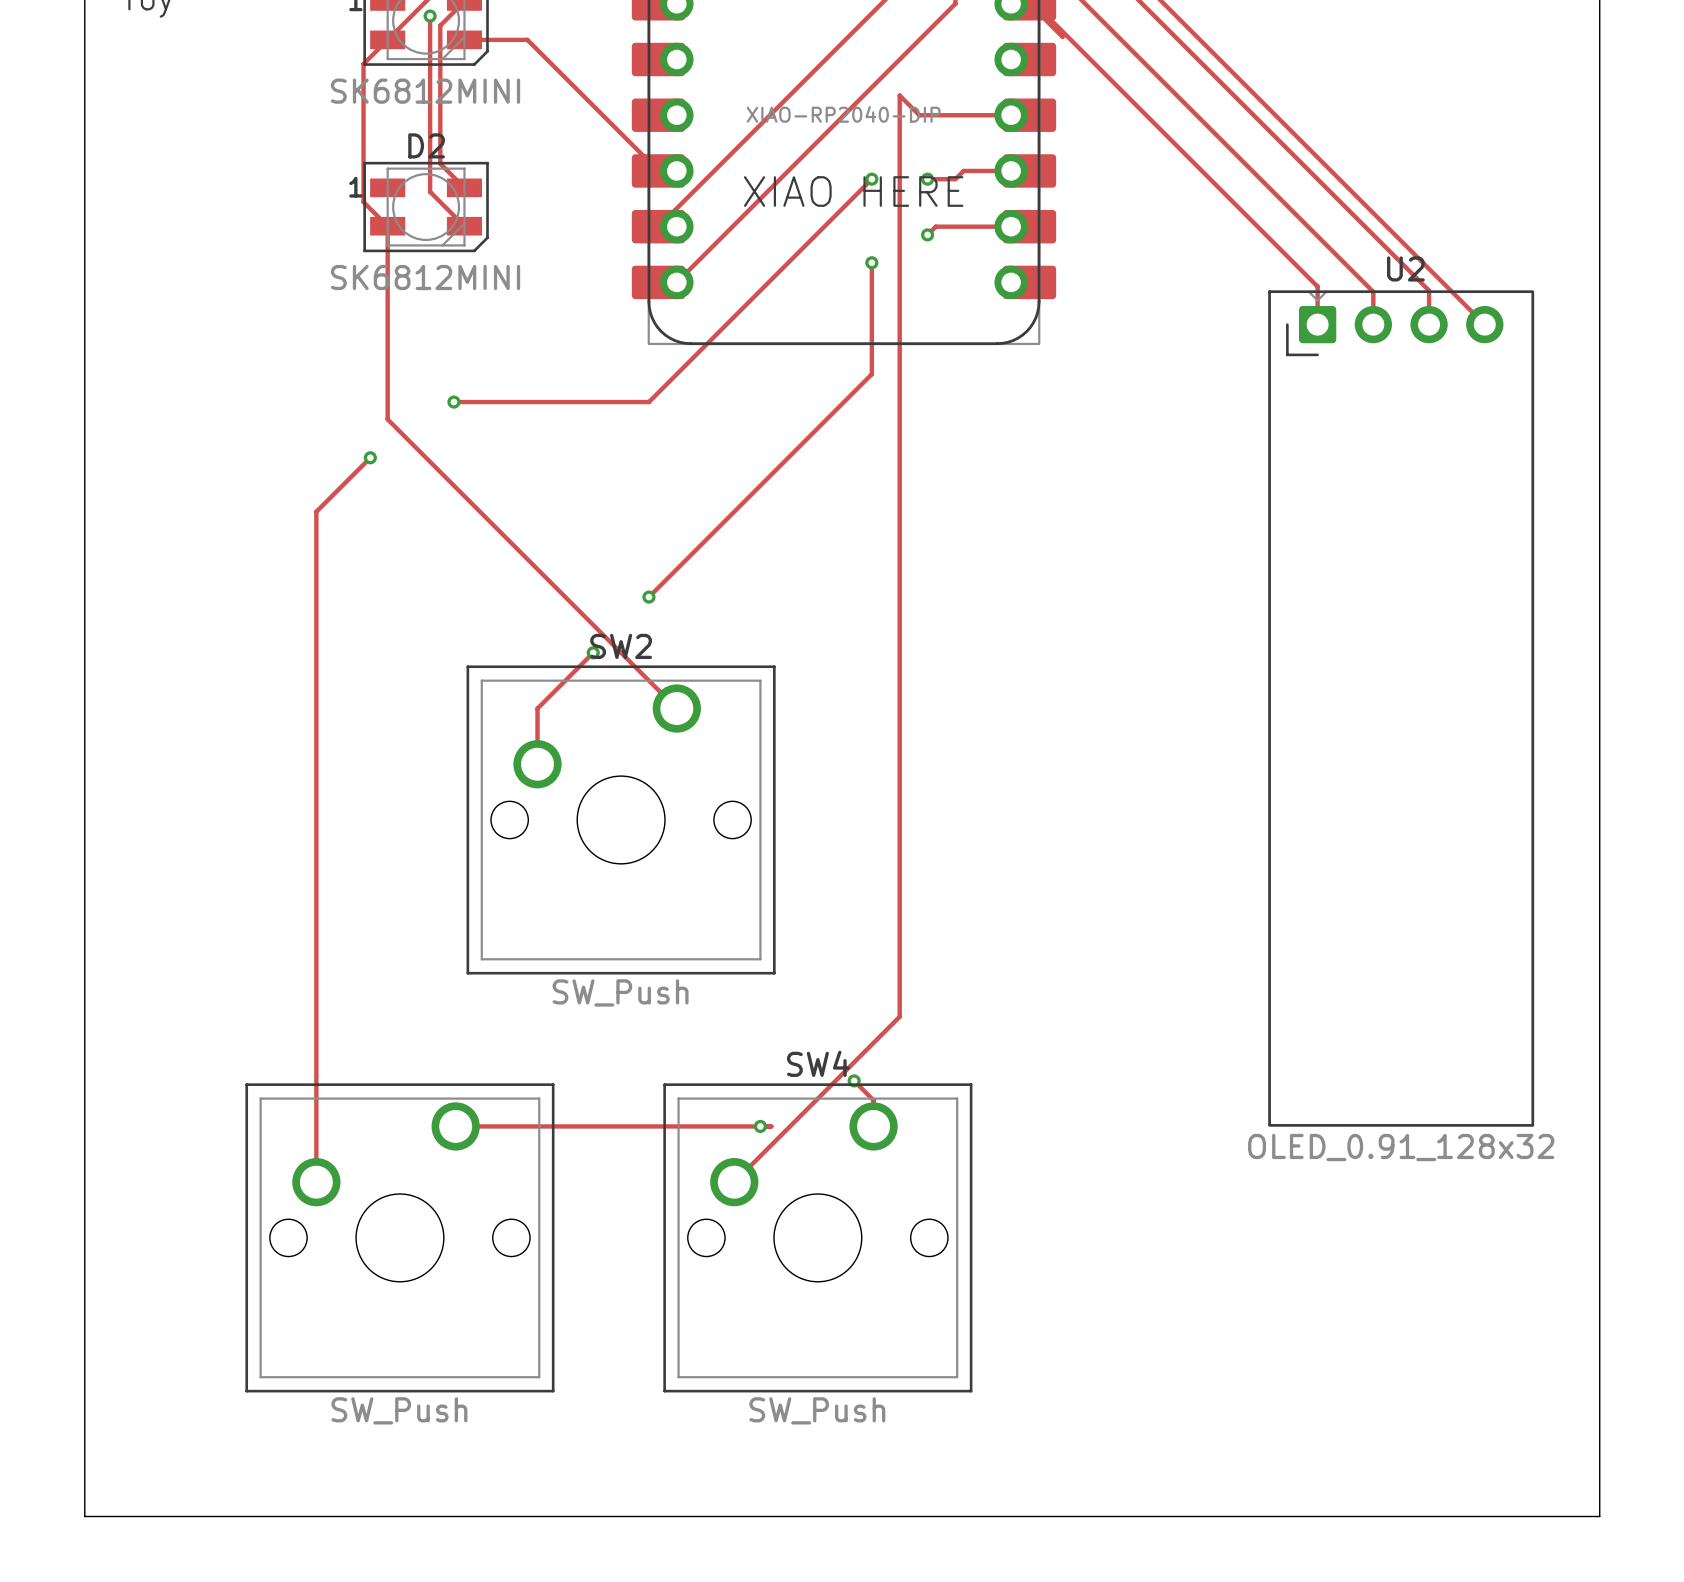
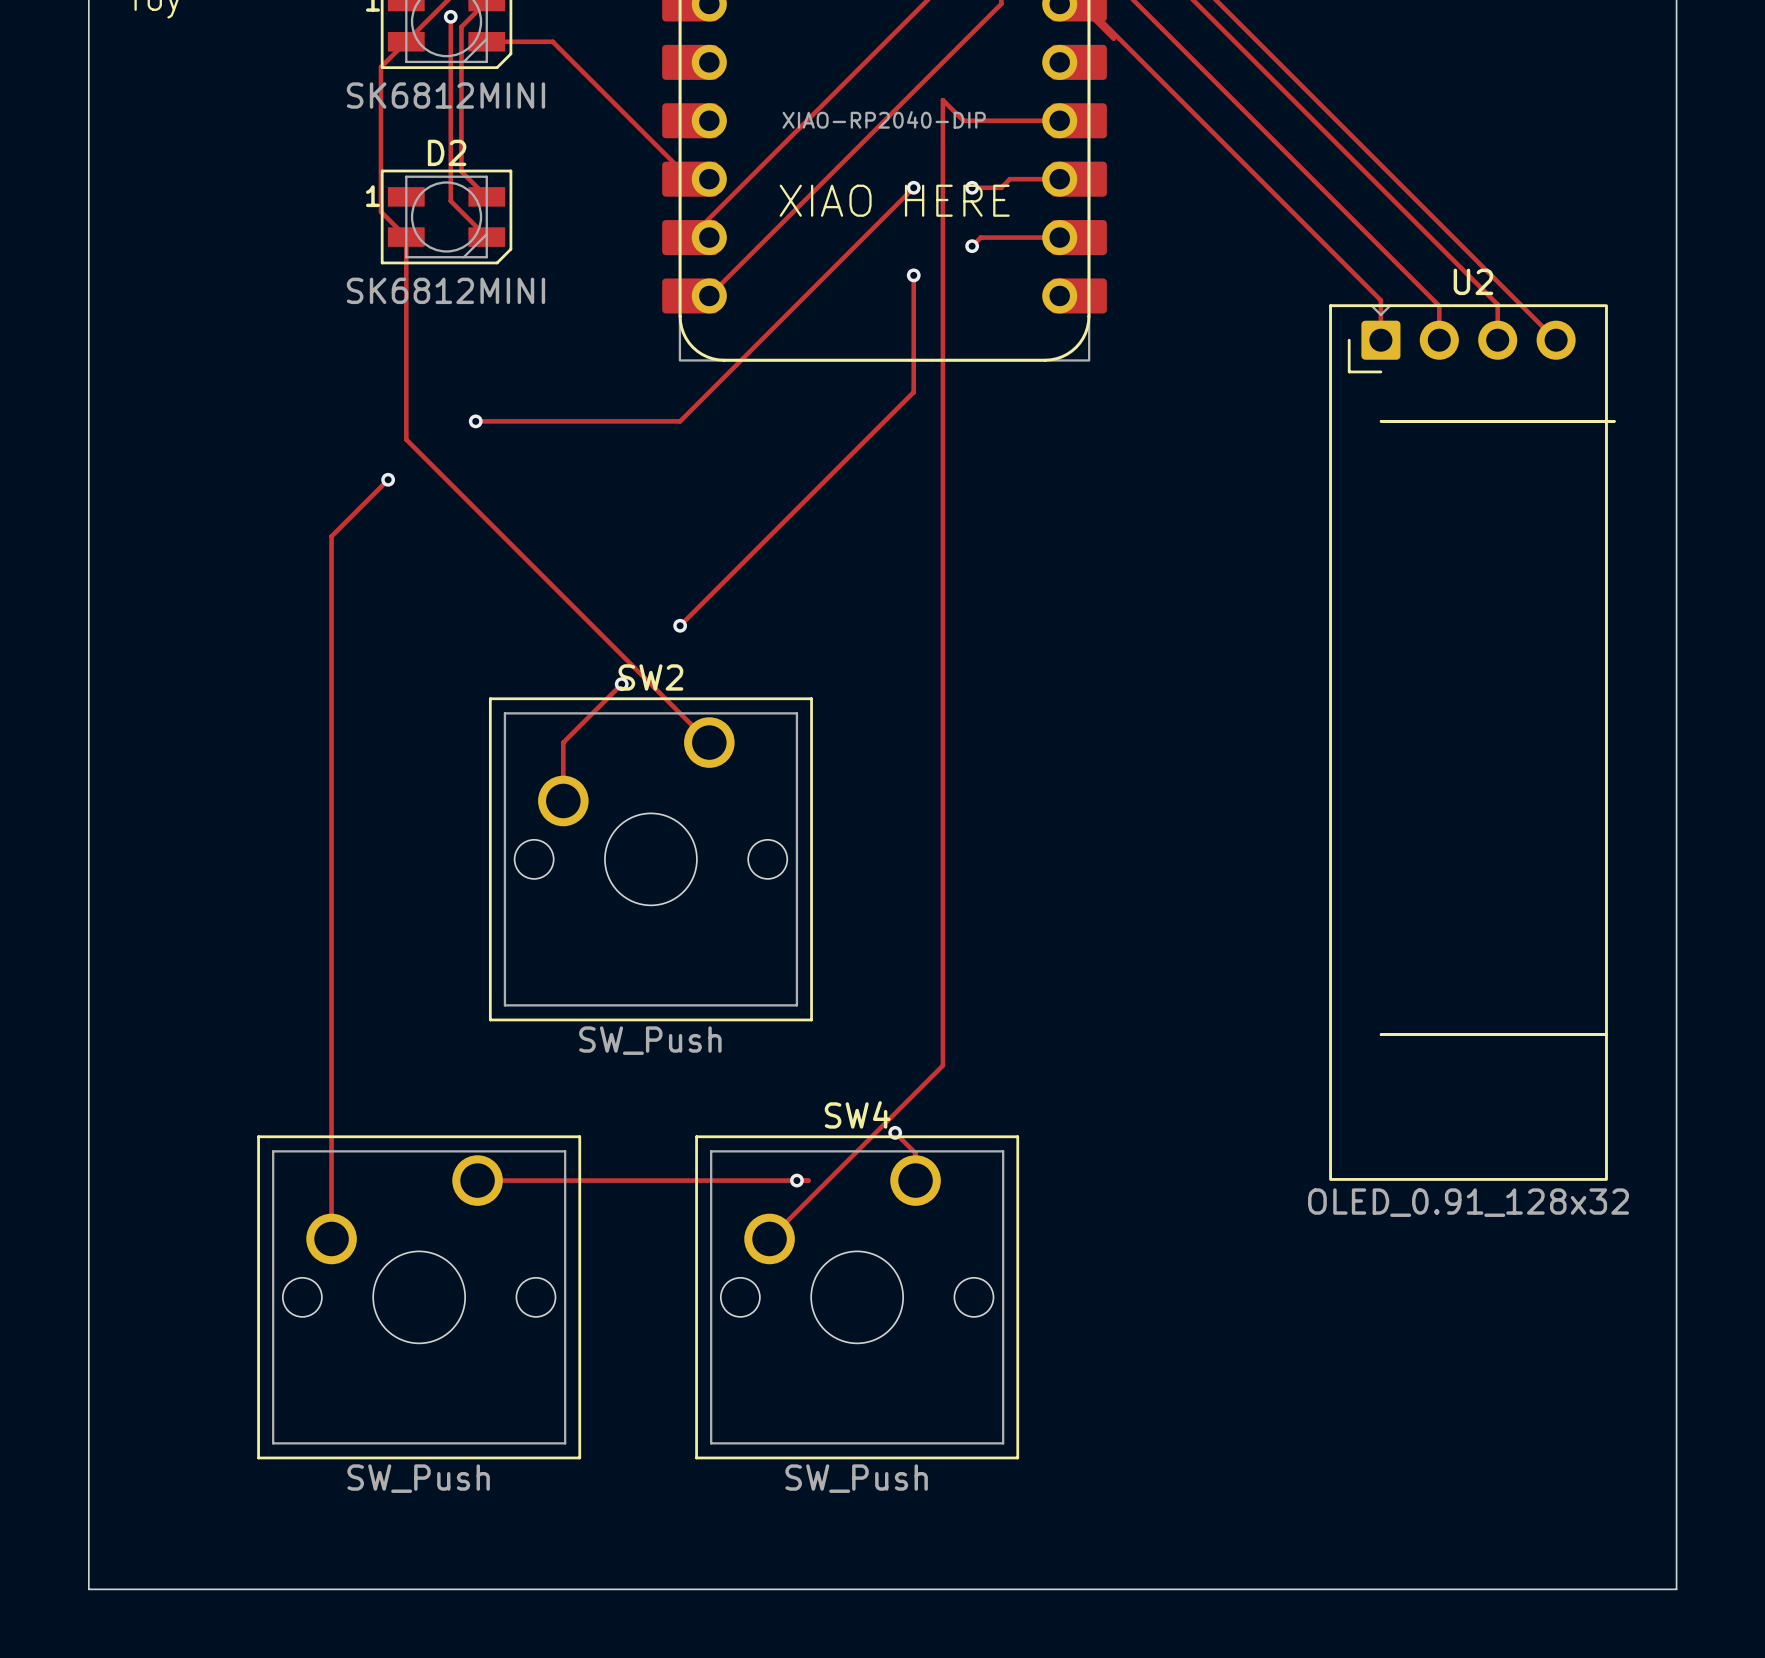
line: none -> (1380, 421) (1614, 421)
line: none -> (1380, 1034) (1606, 1034)

